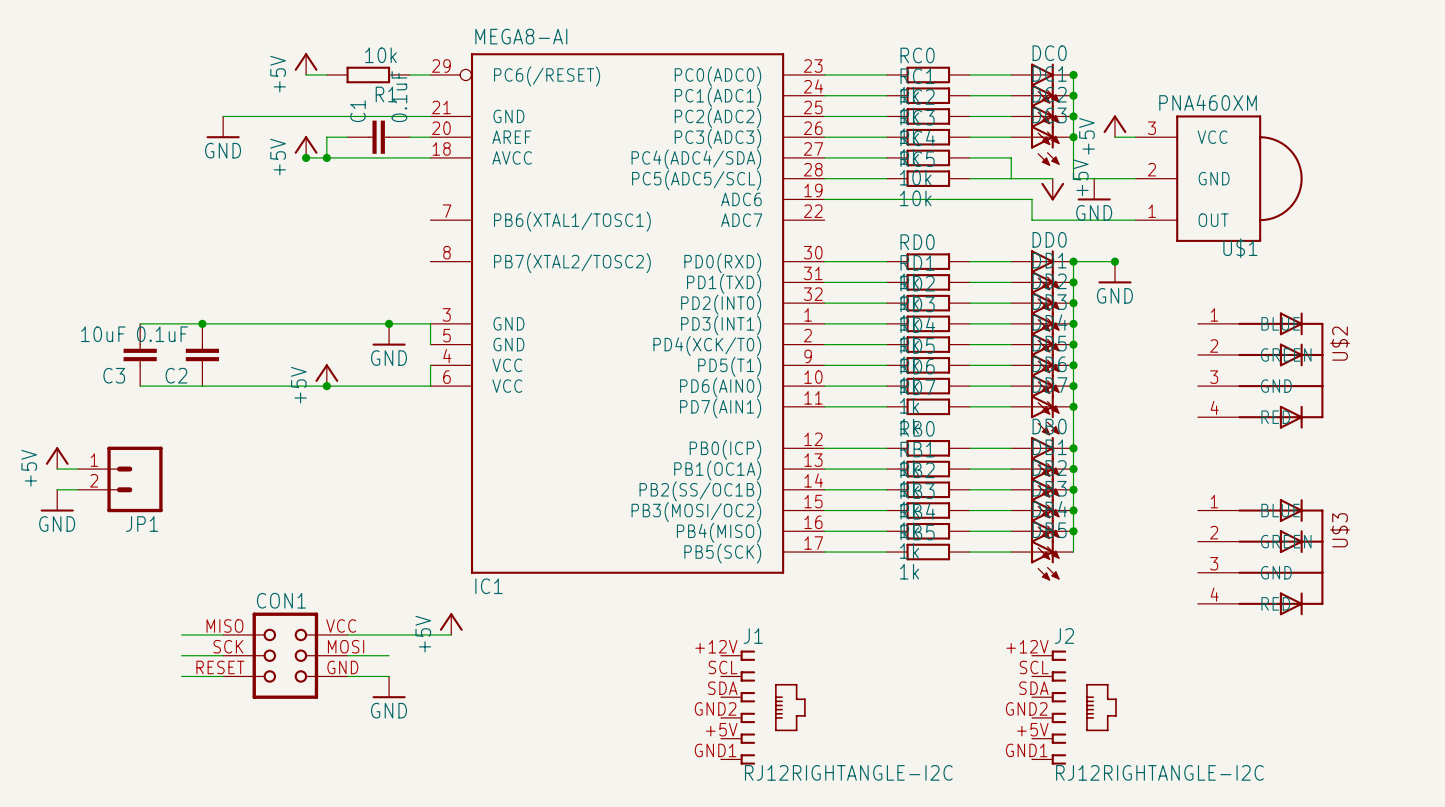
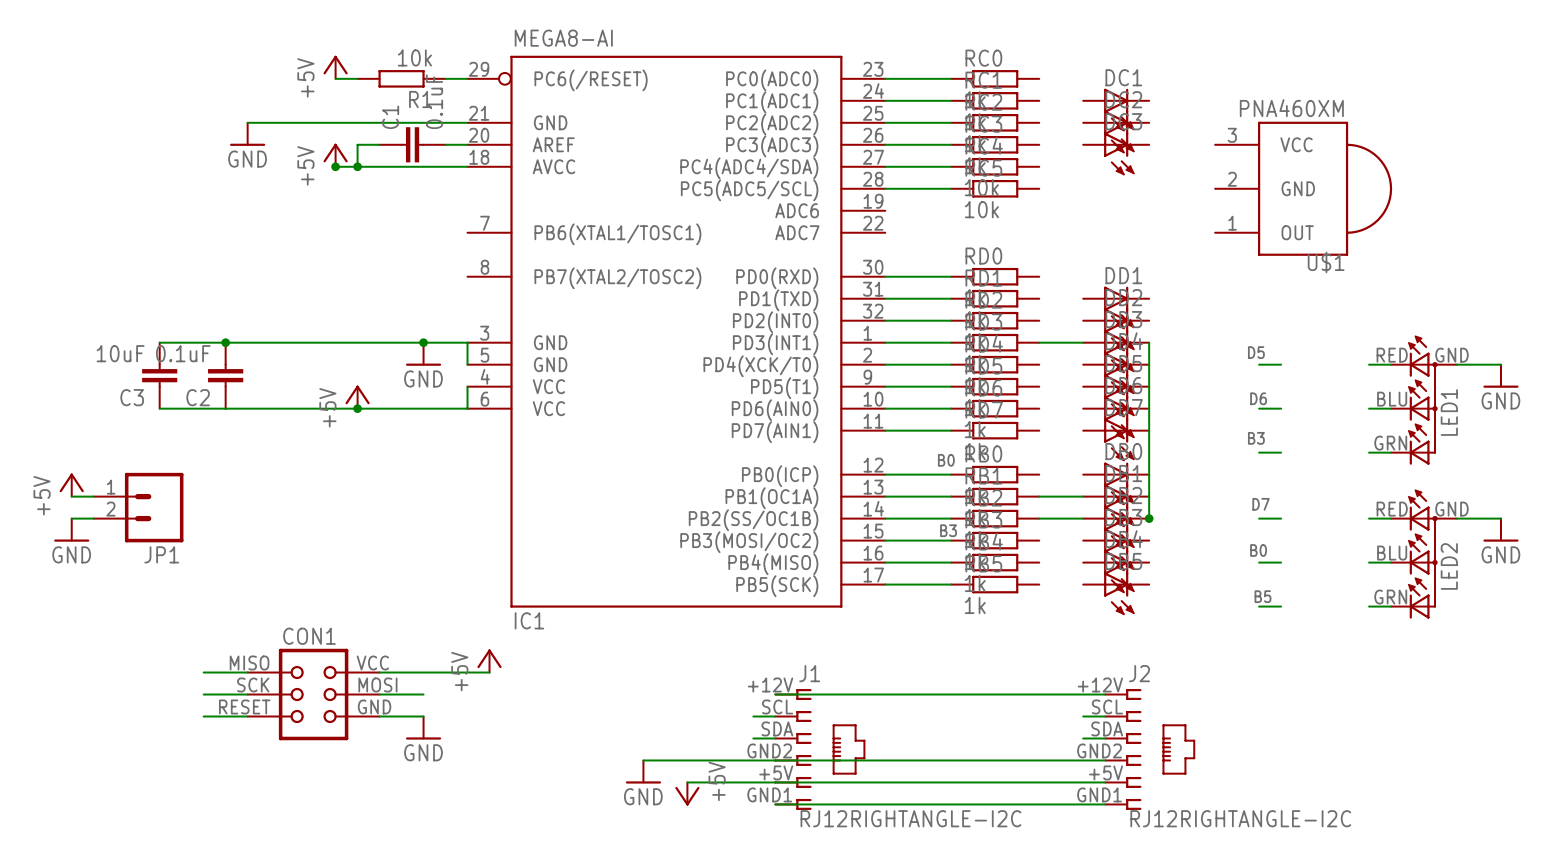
wire: (969, 74) (1011, 74) -> none
wire: (1073, 74) (1073, 178) (1135, 178) -> none
junction: (1073, 74) -> none
DC0: (1042, 83) -> none
wire: (969, 95) (1011, 95) -> none
junction: (1073, 95) -> none
wire: (969, 116) (1011, 116) -> none
junction: (1073, 116) -> none
power symbol: +5V (1114, 126) -> none
wire: (969, 137) (1011, 137) -> none
junction: (1073, 137) -> none
wire: (1114, 137) (1135, 137) -> none
wire: (969, 157) (1011, 157) (1011, 178) -> none
wire: (969, 178) (1052, 178) -> none
power symbol: +5V (1052, 189) -> none
power symbol: GND (1094, 189) -> none
wire: (824, 199) (1032, 199) (1032, 220) (1135, 220) -> none
wire: (969, 261) (1011, 261) -> none
junction: (1073, 261) -> none
wire: (1114, 261) (1073, 261) (1073, 323) -> none
junction: (1114, 261) -> none
DD0: (1042, 270) -> none
power symbol: GND (1114, 272) -> none
wire: (969, 282) (1011, 282) -> none
junction: (1073, 282) -> none
wire: (969, 303) (1011, 303) -> none
junction: (1073, 303) -> none
junction: (1073, 323) -> none
label: none -> D5 (1256, 352)
wire: (969, 344) (1011, 344) -> none
junction: (1073, 344) -> none
wire: none -> (1259, 364) (1281, 364)
wire: none -> (1369, 364) (1391, 364)
wire: none -> (1457, 364) (1500, 364)
power symbol: none -> GND (1500, 376)
wire: (969, 365) (1011, 365) -> none
junction: (1073, 365) -> none
U$2: (1260, 370) -> none
label: none -> D6 (1258, 398)
LED1: none -> (1424, 400)
wire: (969, 386) (1011, 386) -> none
junction: (1073, 386) -> none
wire: none -> (1259, 408) (1281, 408)
wire: (969, 406) (1011, 406) -> none
junction: (1073, 406) -> none
label: none -> B3 (1256, 438)
wire: none -> (1259, 452) (1281, 452)
wire: none -> (1369, 452) (1391, 452)
label: none -> B0 (946, 460)
wire: (969, 448) (1011, 448) -> none
junction: (1073, 448) -> none
junction: (1073, 469) -> none
label: none -> D7 (1261, 504)
wire: (1073, 489) (1073, 552) -> none
wire: none -> (1259, 518) (1281, 518)
wire: none -> (1369, 518) (1391, 518)
wire: none -> (1457, 518) (1500, 518)
power symbol: none -> GND (1500, 530)
label: none -> B3 (948, 530)
wire: (969, 510) (1011, 510) -> none
junction: (1073, 510) -> none
label: none -> B0 (1258, 550)
LED2: none -> (1424, 554)
wire: (969, 531) (1011, 531) -> none
junction: (1073, 531) -> none
wire: none -> (1259, 562) (1281, 562)
wire: none -> (1369, 562) (1391, 562)
wire: (969, 552) (1011, 552) -> none
U$3: (1260, 557) -> none
label: none -> B5 (1262, 596)
wire: none -> (1259, 606) (1281, 606)
wire: none -> (775, 694) (1105, 694)
wire: none -> (753, 716) (775, 716)
wire: none -> (1083, 716) (1105, 716)
wire: none -> (753, 738) (775, 738)
wire: none -> (1083, 738) (1105, 738)
wire: none -> (643, 760) (1105, 760)
power symbol: none -> GND (643, 772)
wire: none -> (687, 782) (1105, 782)
power symbol: none -> +5V (687, 794)
wire: none -> (775, 804) (1105, 804)

